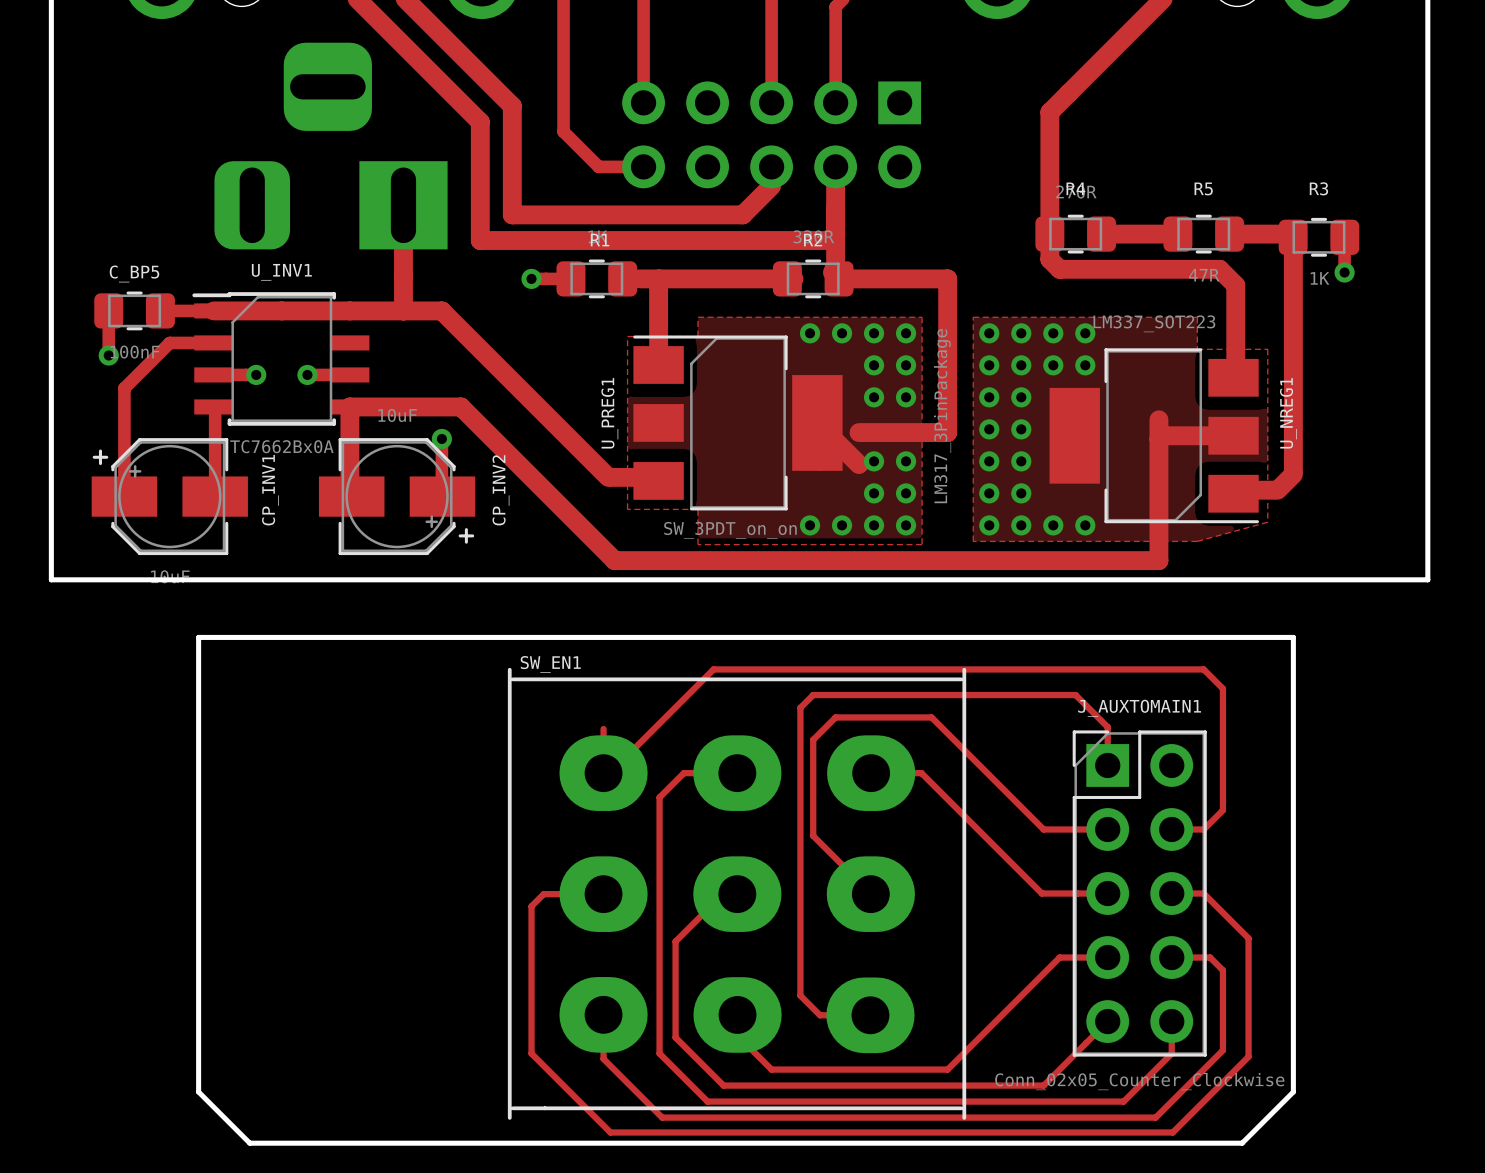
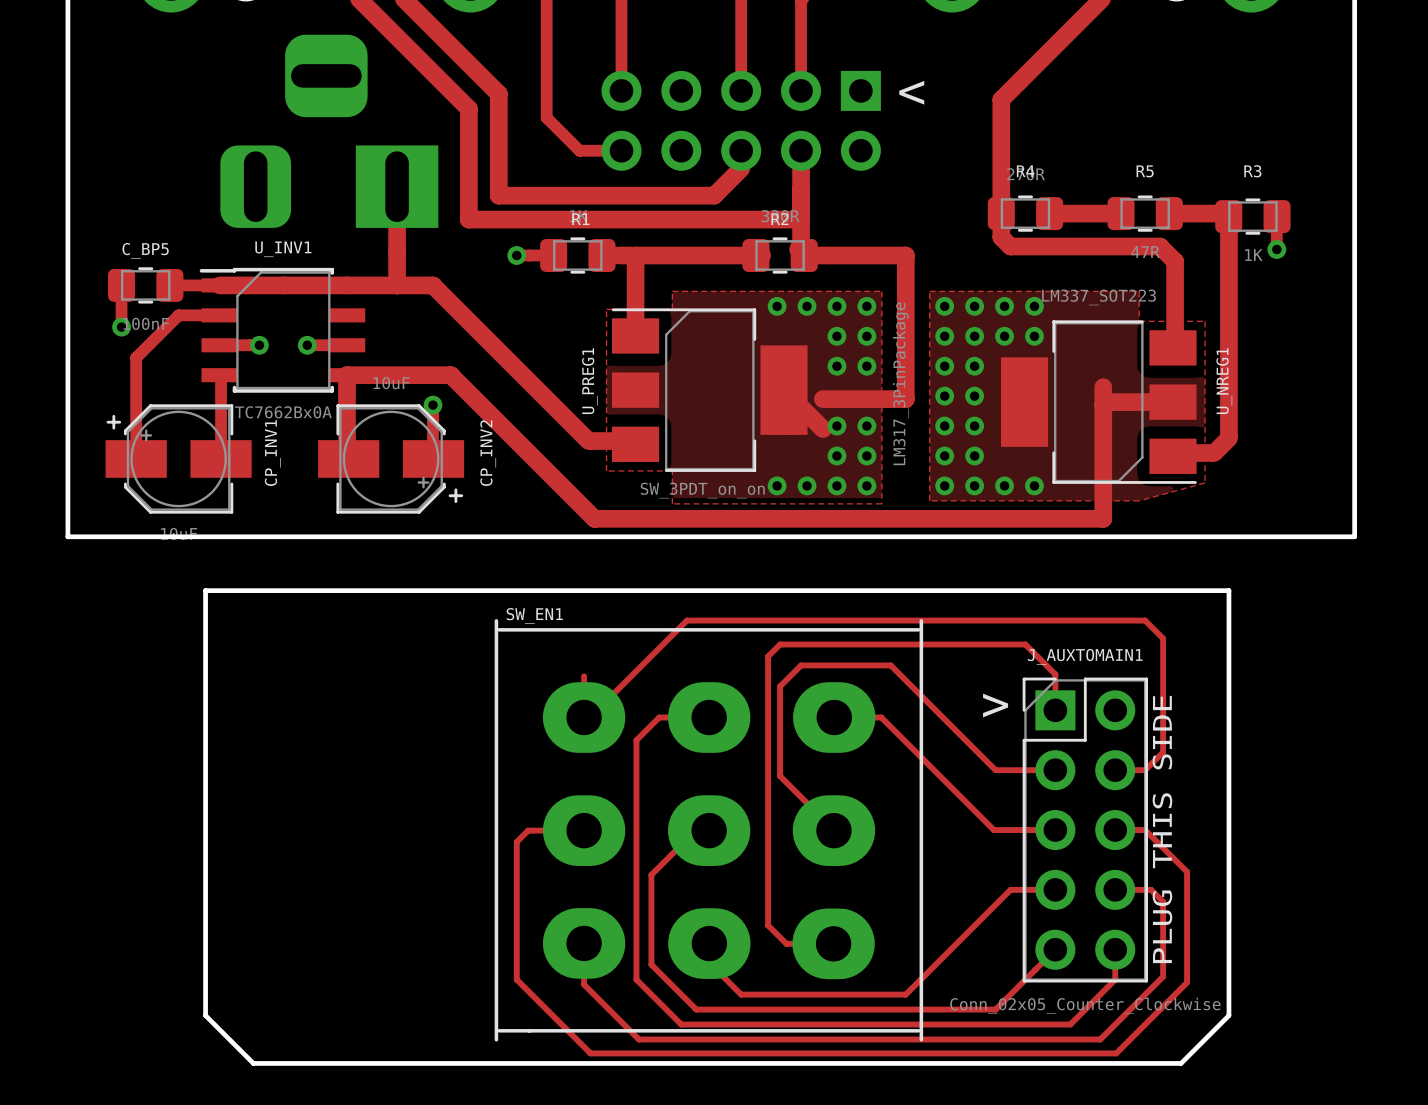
text: none -> > (911, 92)
text: none -> > (995, 705)
text: none -> PLUG THIS SIDE (1162, 829)

